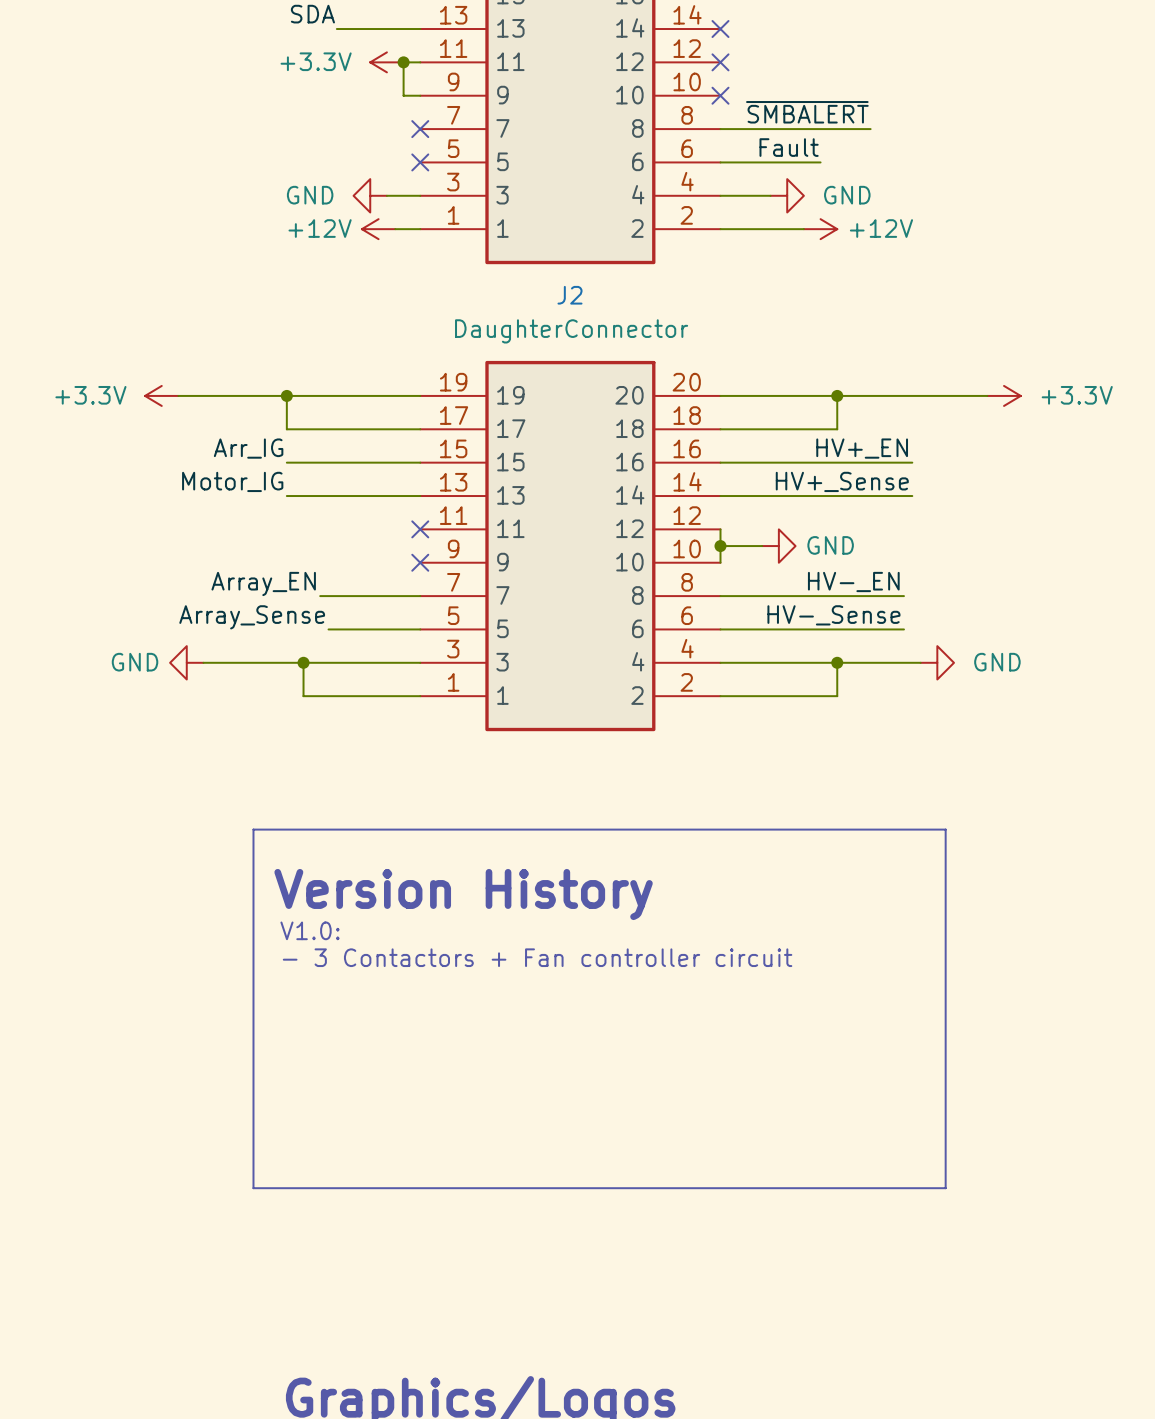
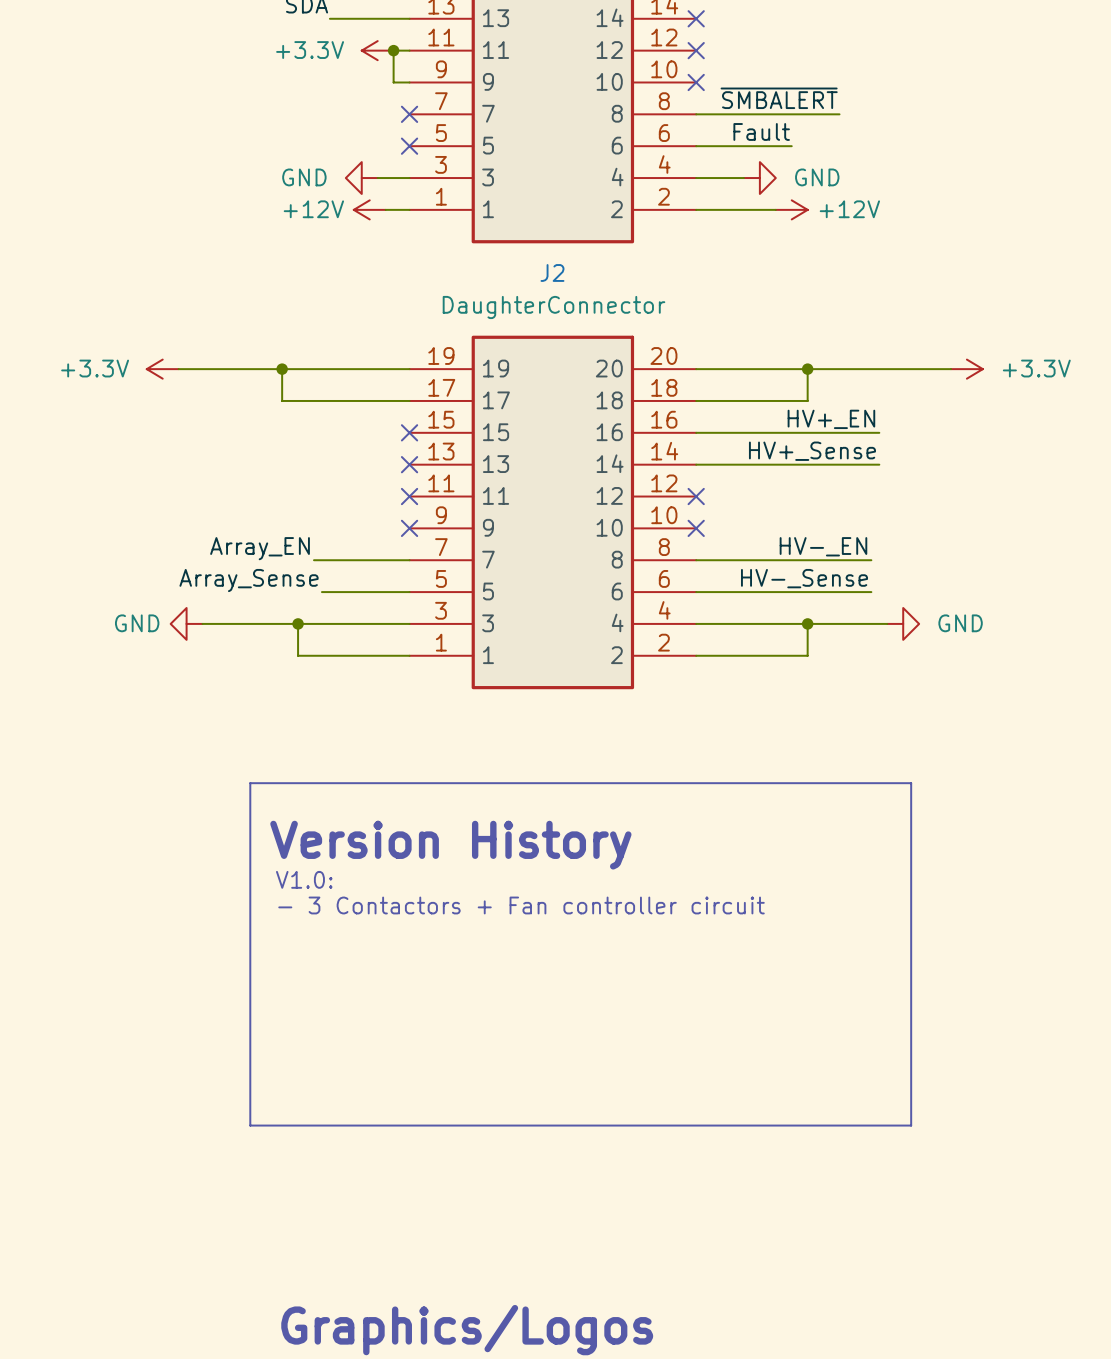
label: Arr_IG (248, 448) -> none
wire: (286, 462) (420, 462) -> none
no-connect mark: none -> (409, 432)
label: Motor_IG (232, 481) -> none
wire: (286, 496) (420, 496) -> none
no-connect mark: none -> (409, 464)
wire: (720, 529) (720, 562) -> none
no-connect mark: none -> (696, 496)
wire: (720, 546) (762, 546) -> none
junction: (720, 546) -> none
power symbol: GND (778, 546) -> none
no-connect mark: none -> (696, 528)

